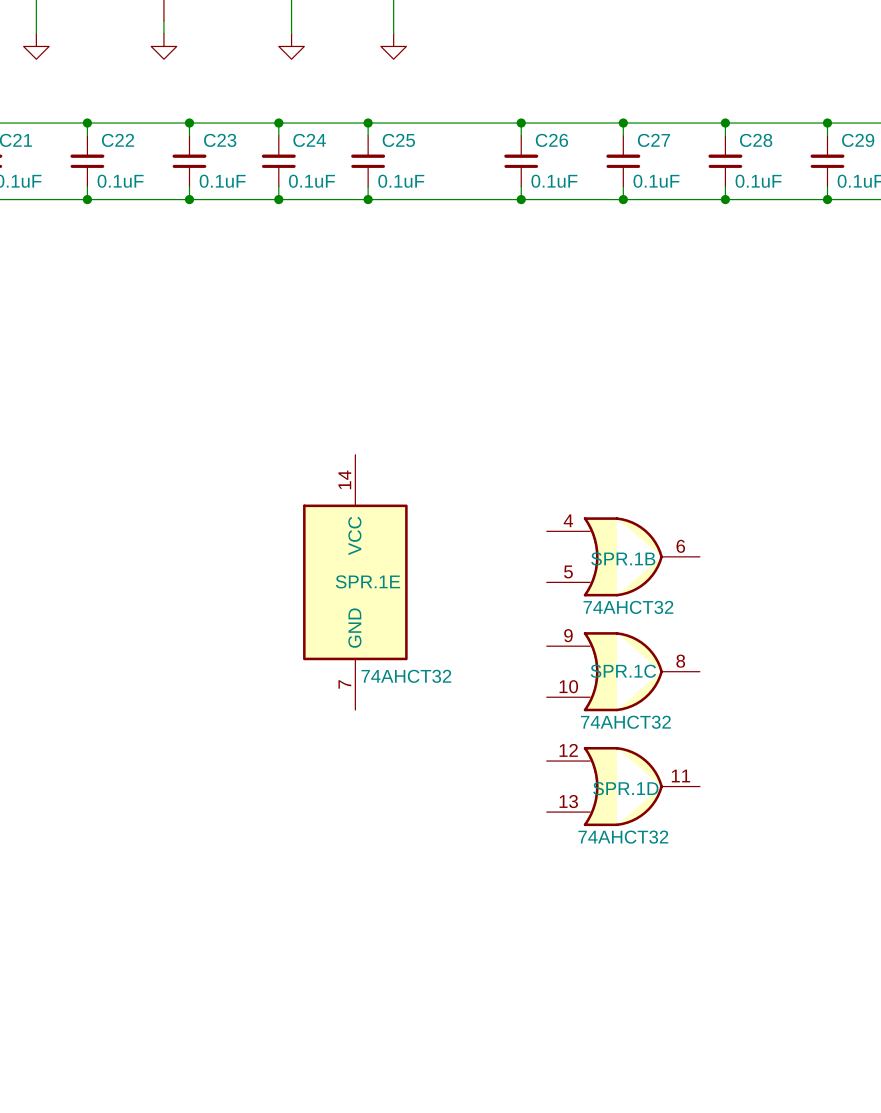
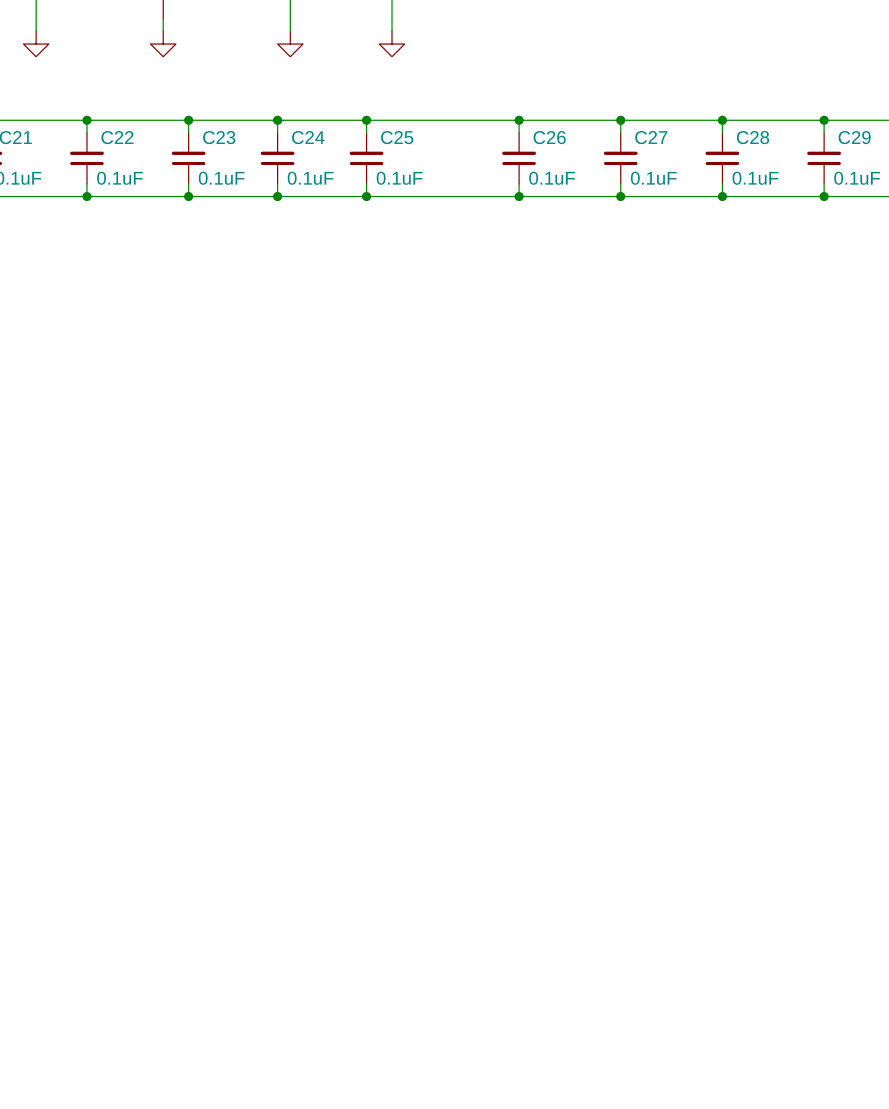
SPR.1B: 74AHCT32 (623, 556) -> none
SPR.1E: 74AHCT32 (355, 582) -> none
SPR.1C: 74AHCT32 (623, 671) -> none
SPR.1D: 74AHCT32 (623, 786) -> none

